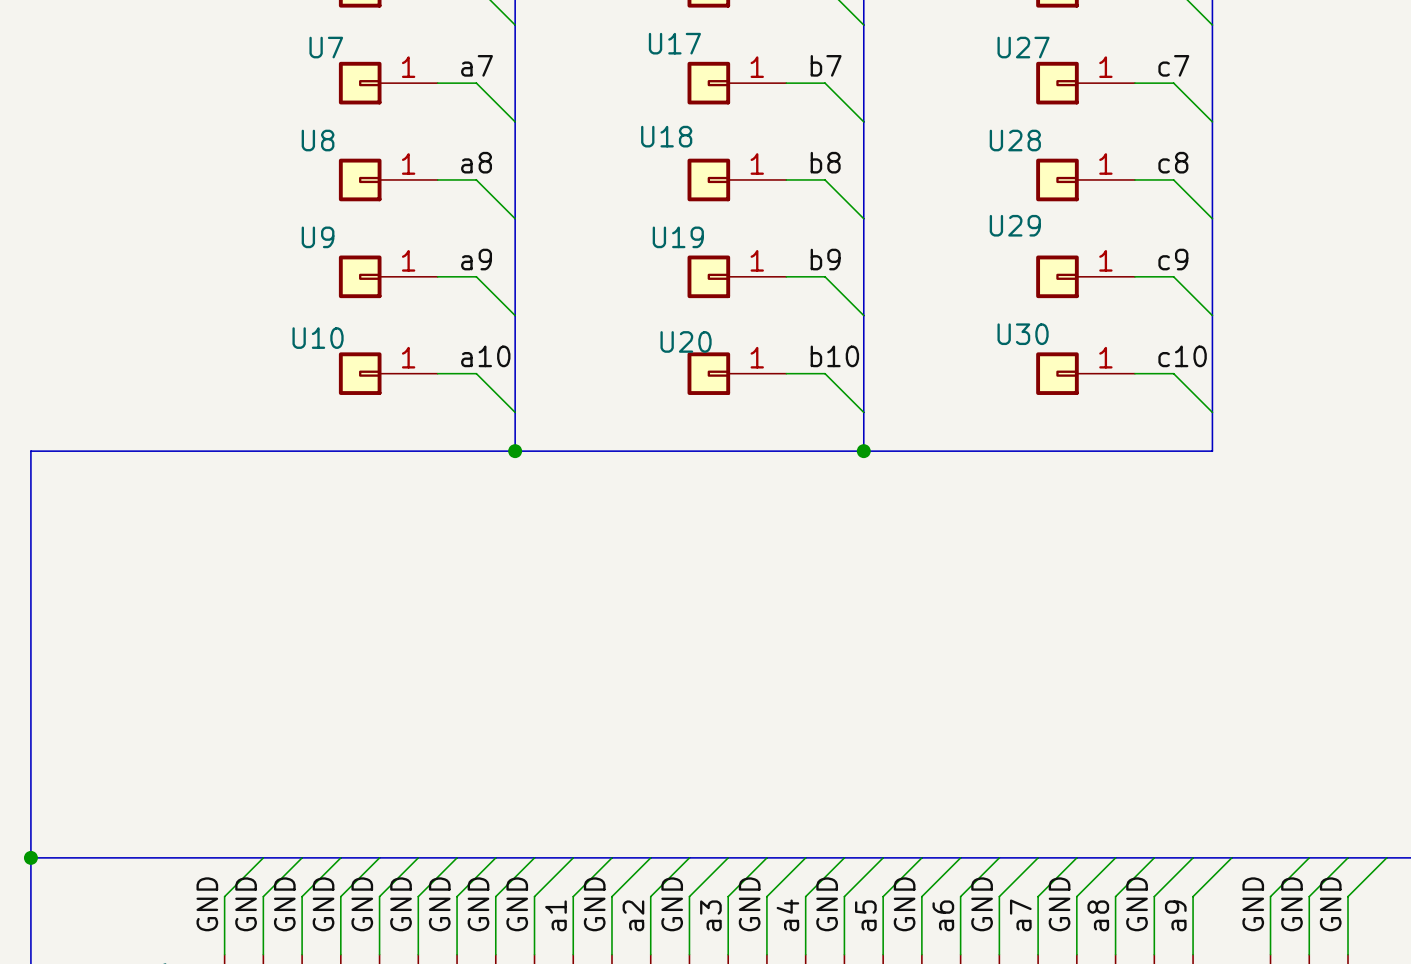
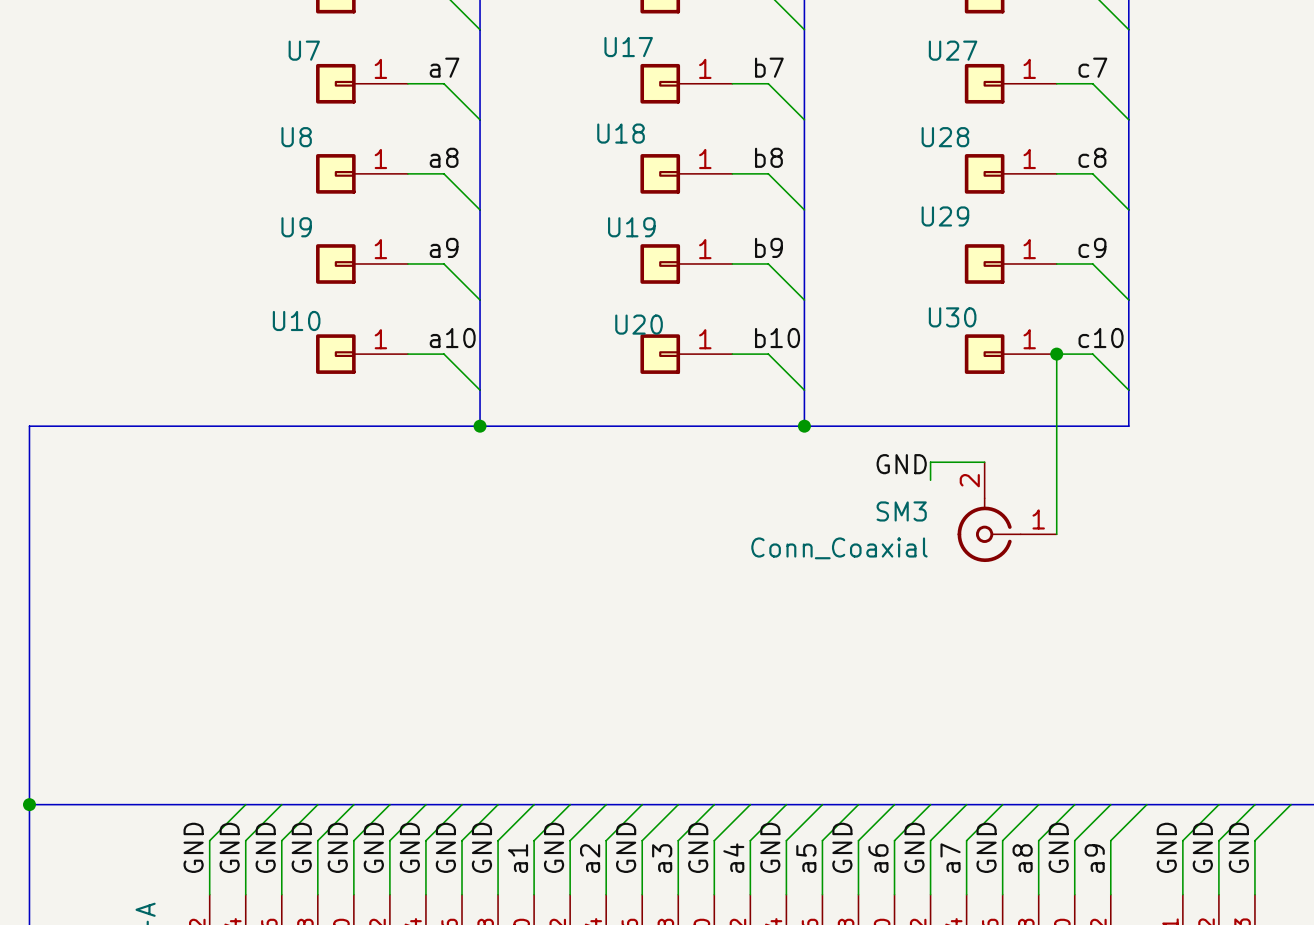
wire: none -> (1056, 354) (1056, 534)
junction: none -> (1056, 354)
wire: none -> (984, 462) (930, 462) (930, 480)
label: none -> GND (901, 464)
SM3: none -> Conn_Coaxial (1007, 512)

